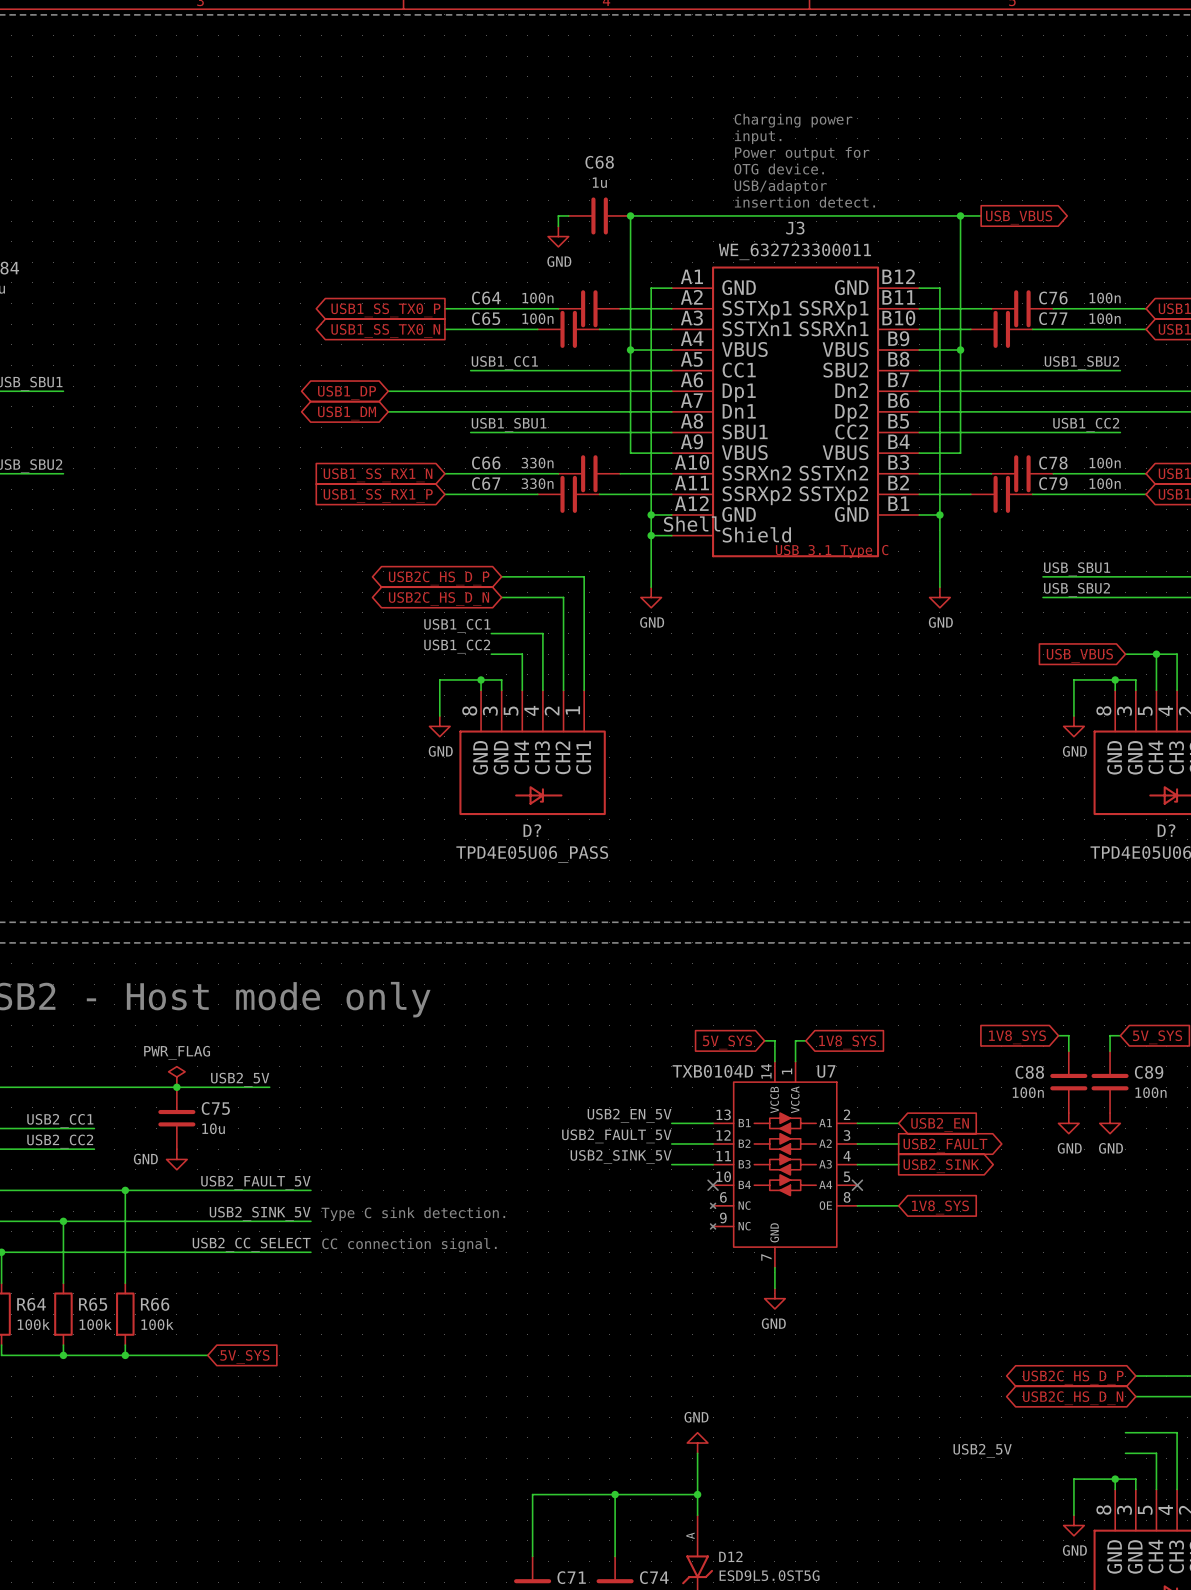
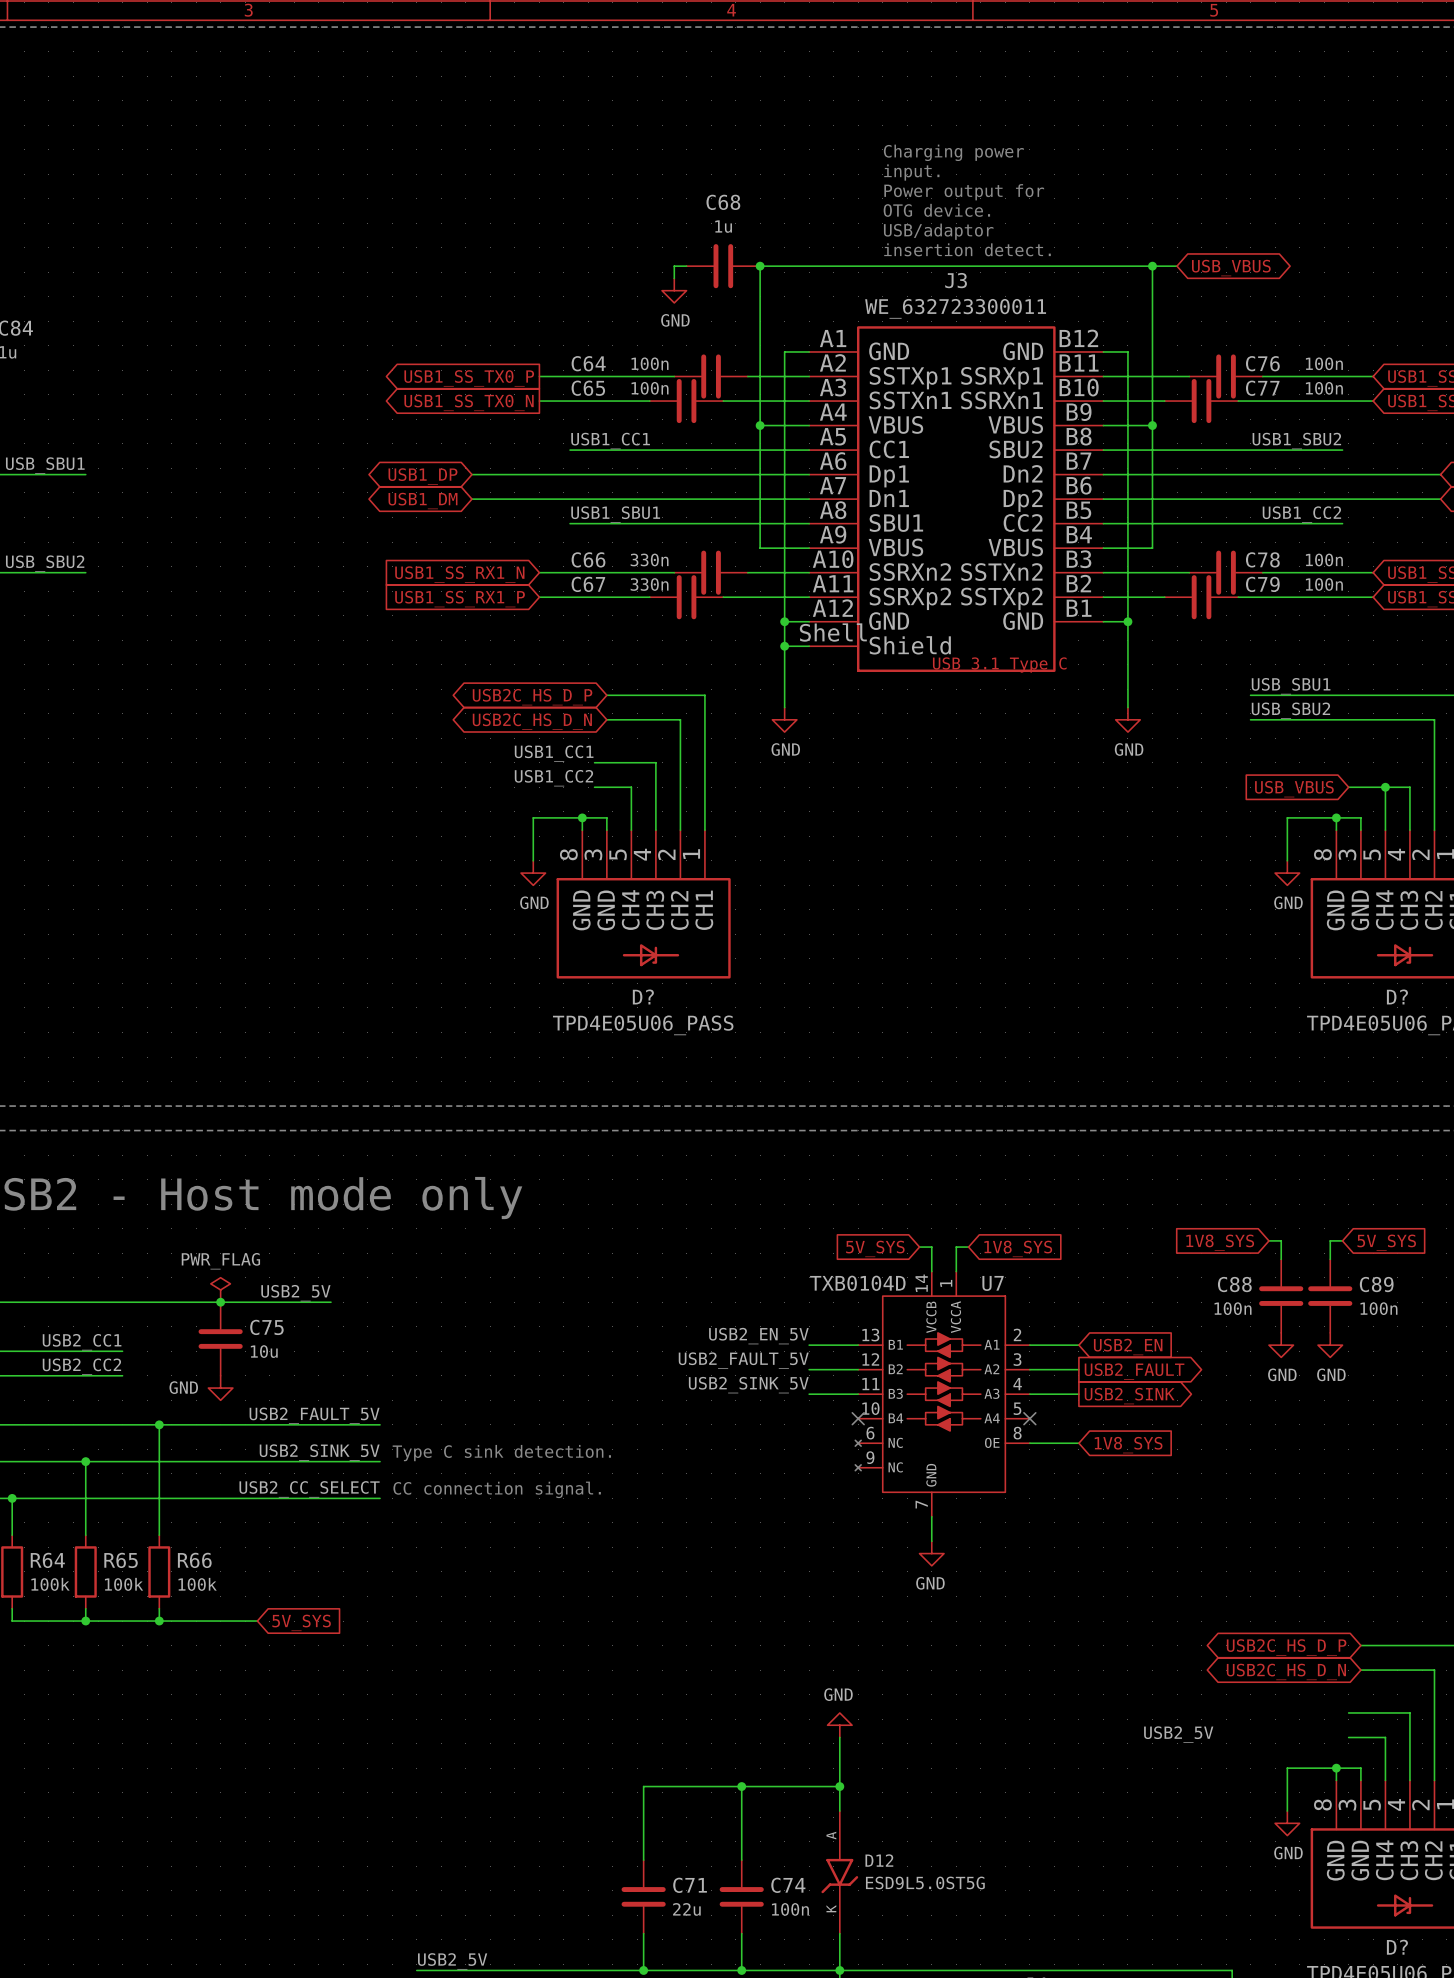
global label shape: output (1019, 217) -> bidirectional (1231, 268)

